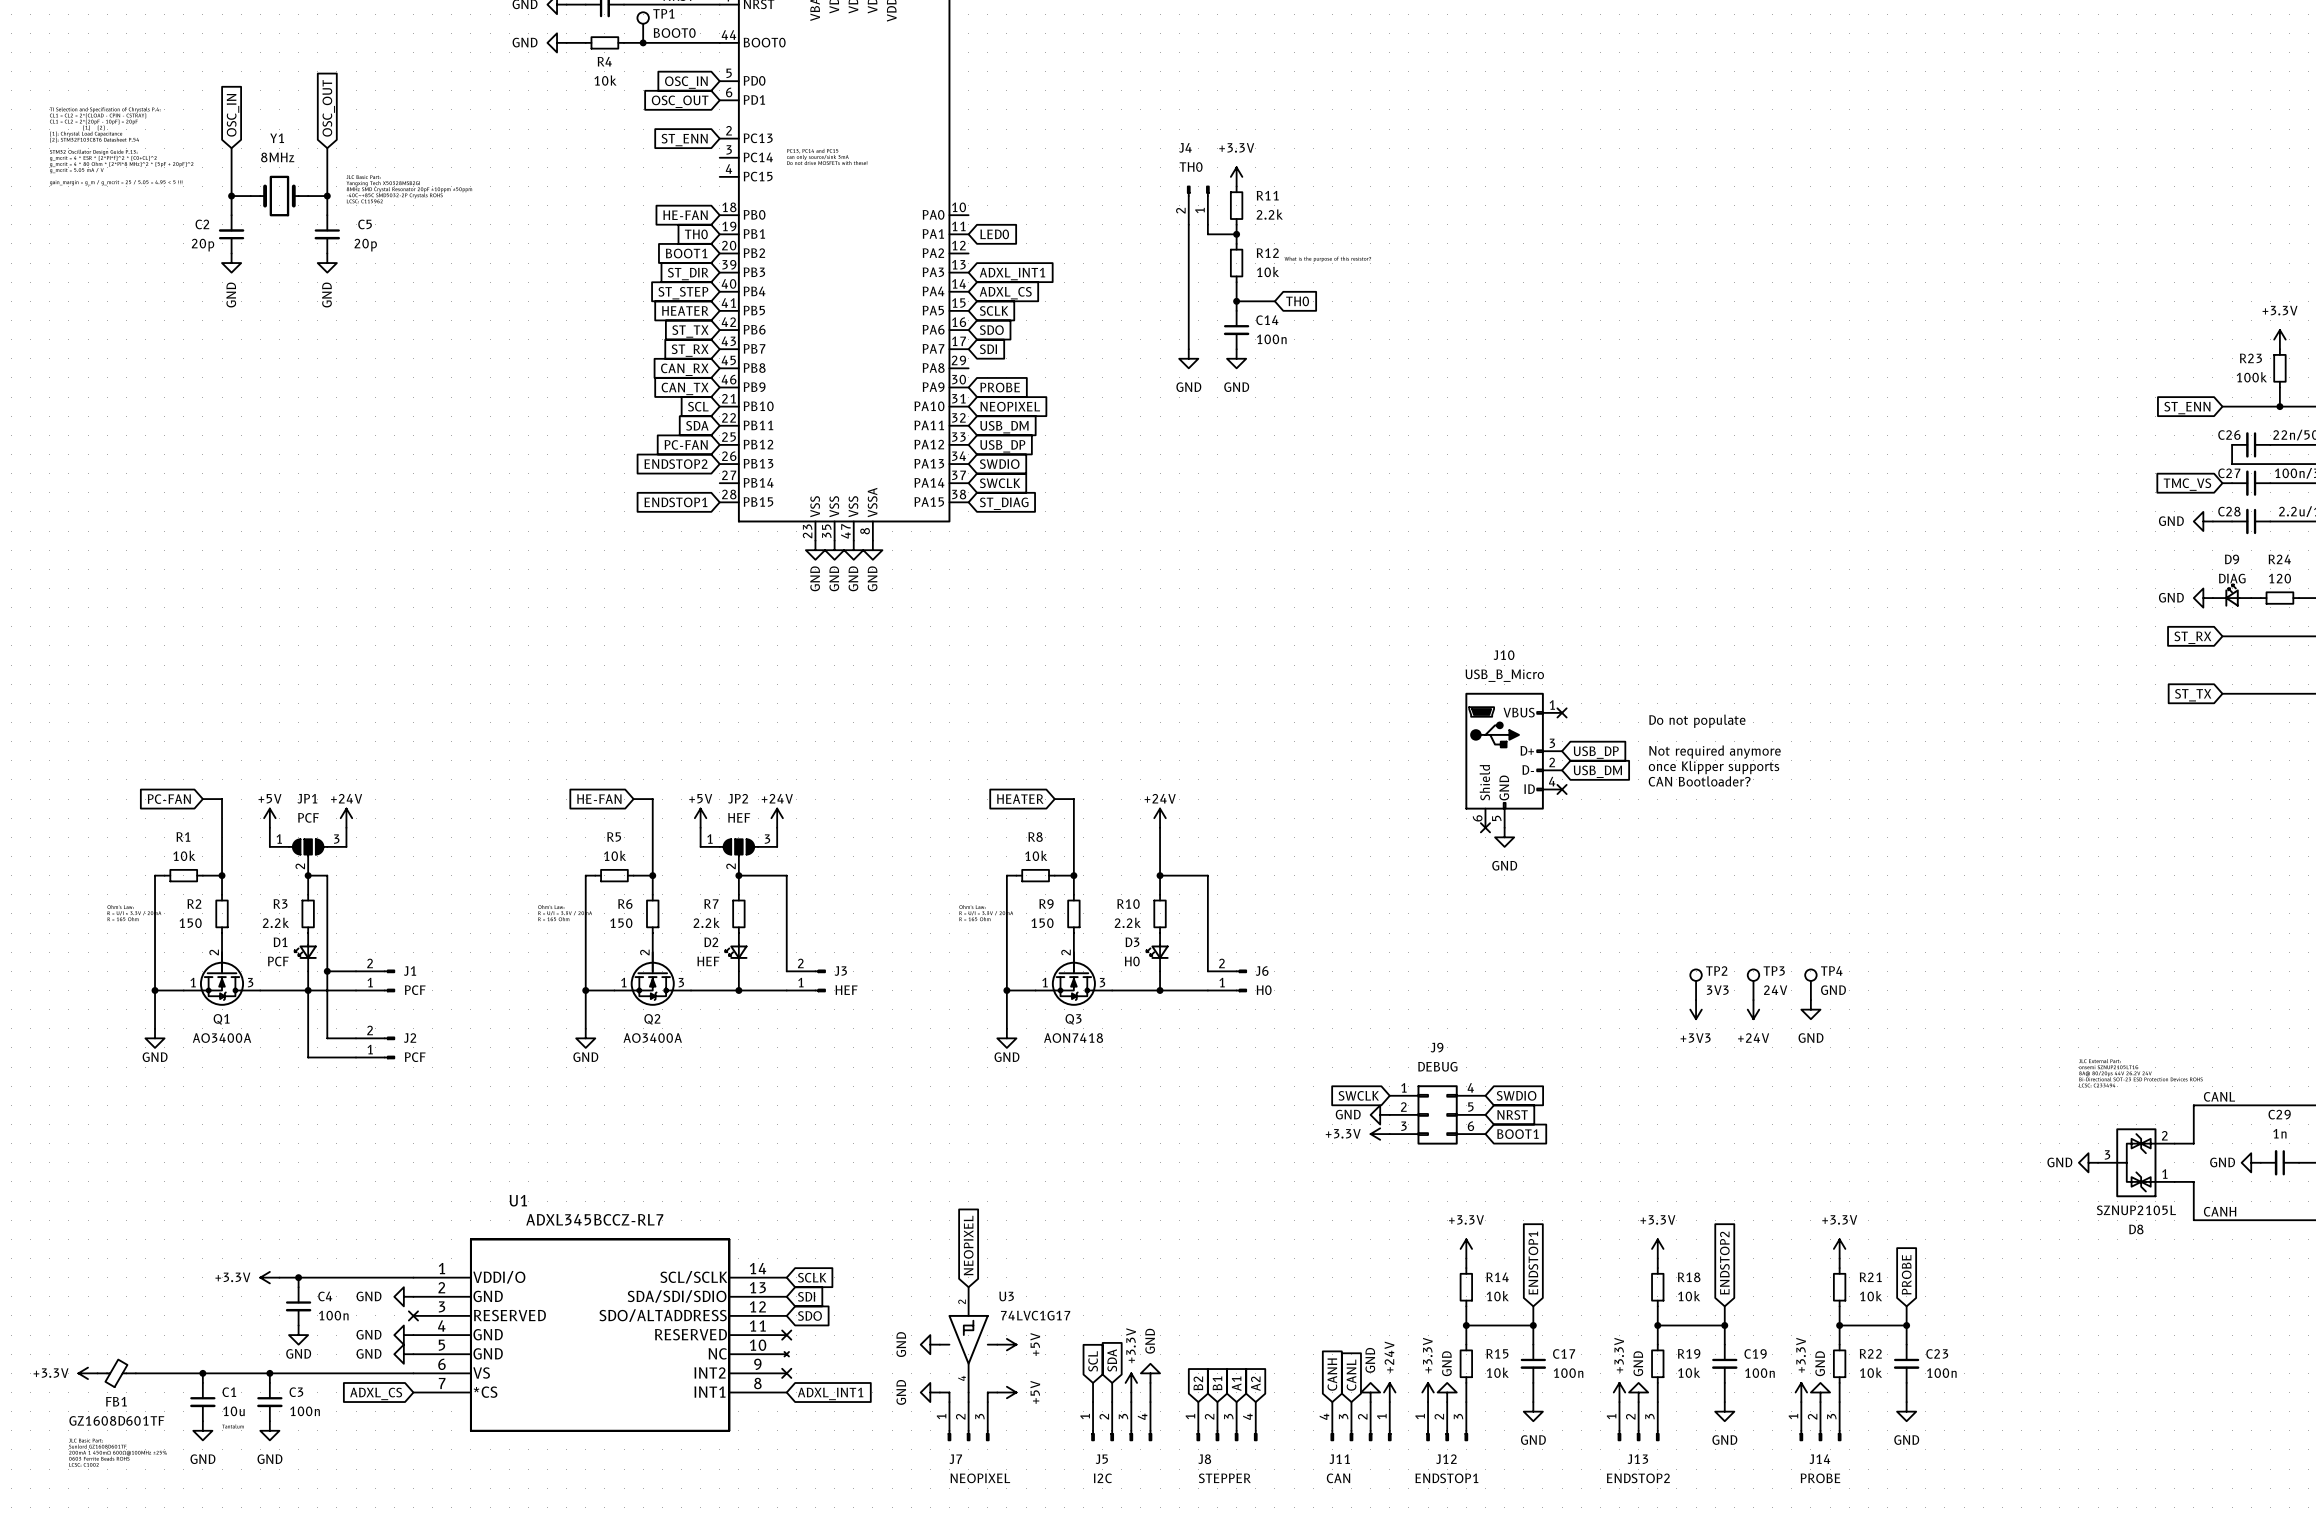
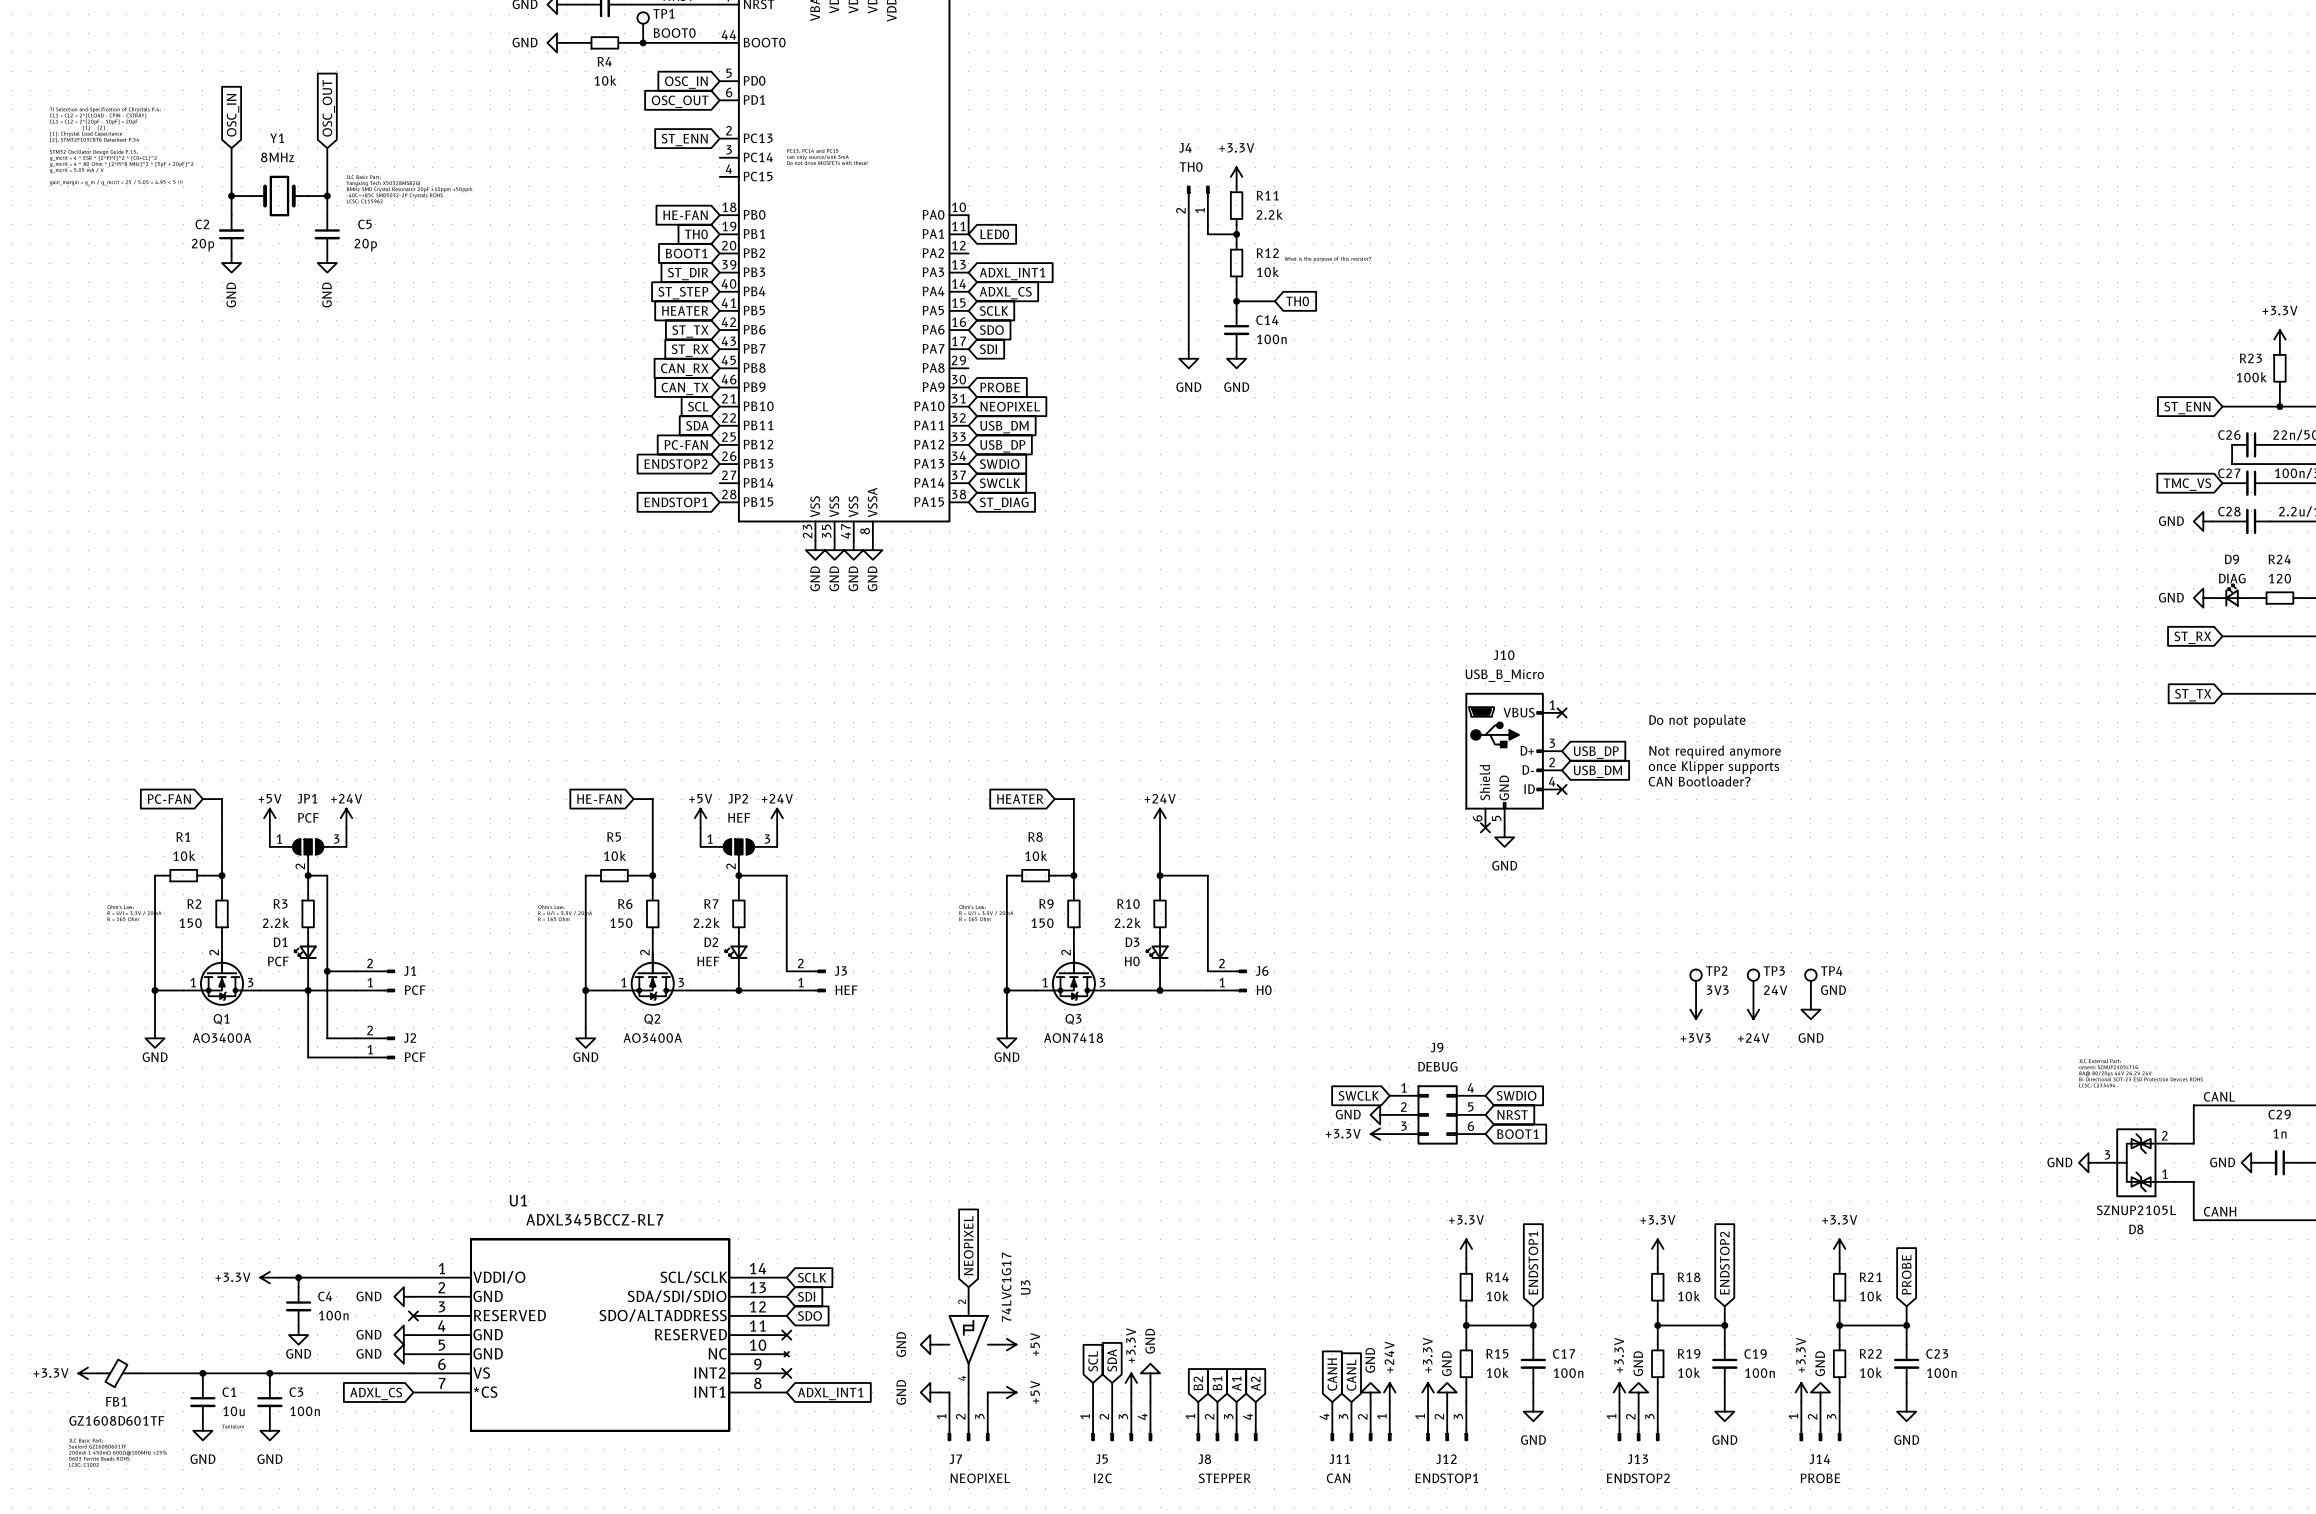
wire: none -> (968, 215) (968, 234)
U3 name rotation: 0° (1006, 1296) -> 90° counterclockwise (1025, 1287)
U3 value rotation: 0° (1035, 1315) -> 90° counterclockwise (1006, 1287)

